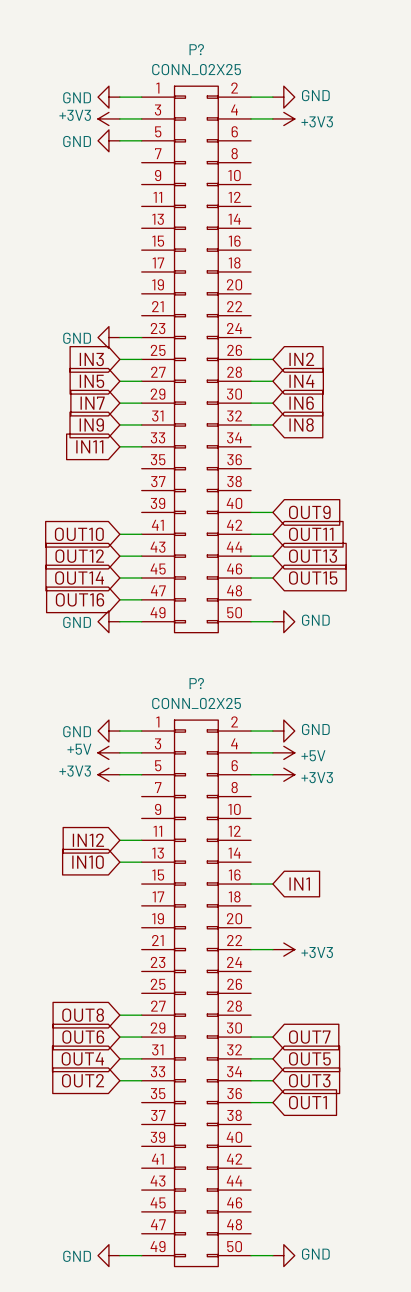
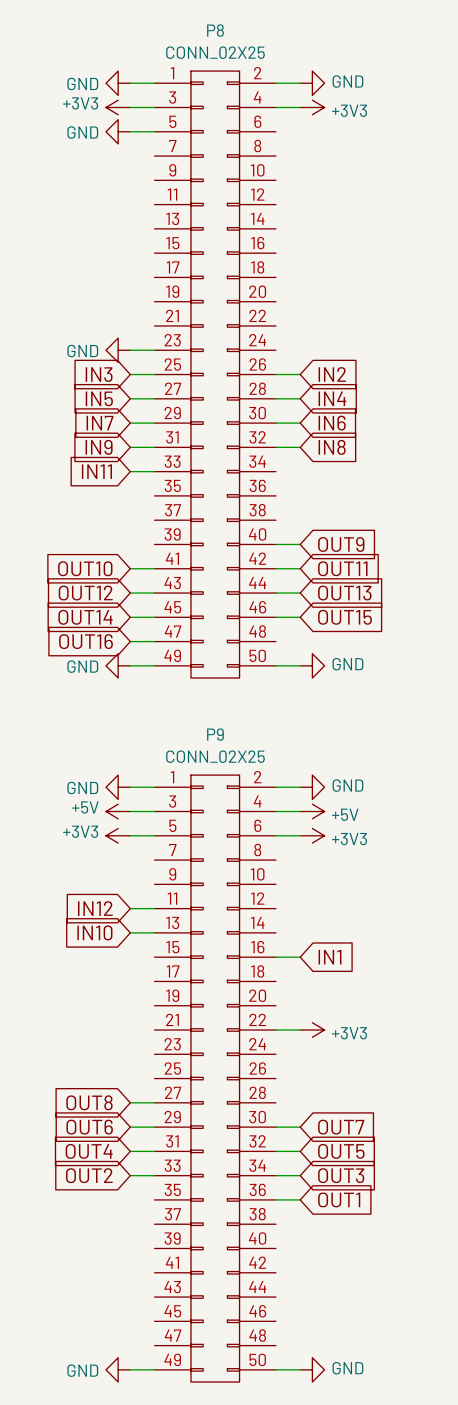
P? name: P? (196, 49) -> P8 (215, 30)
P? name: P? (196, 683) -> P9 (215, 734)

